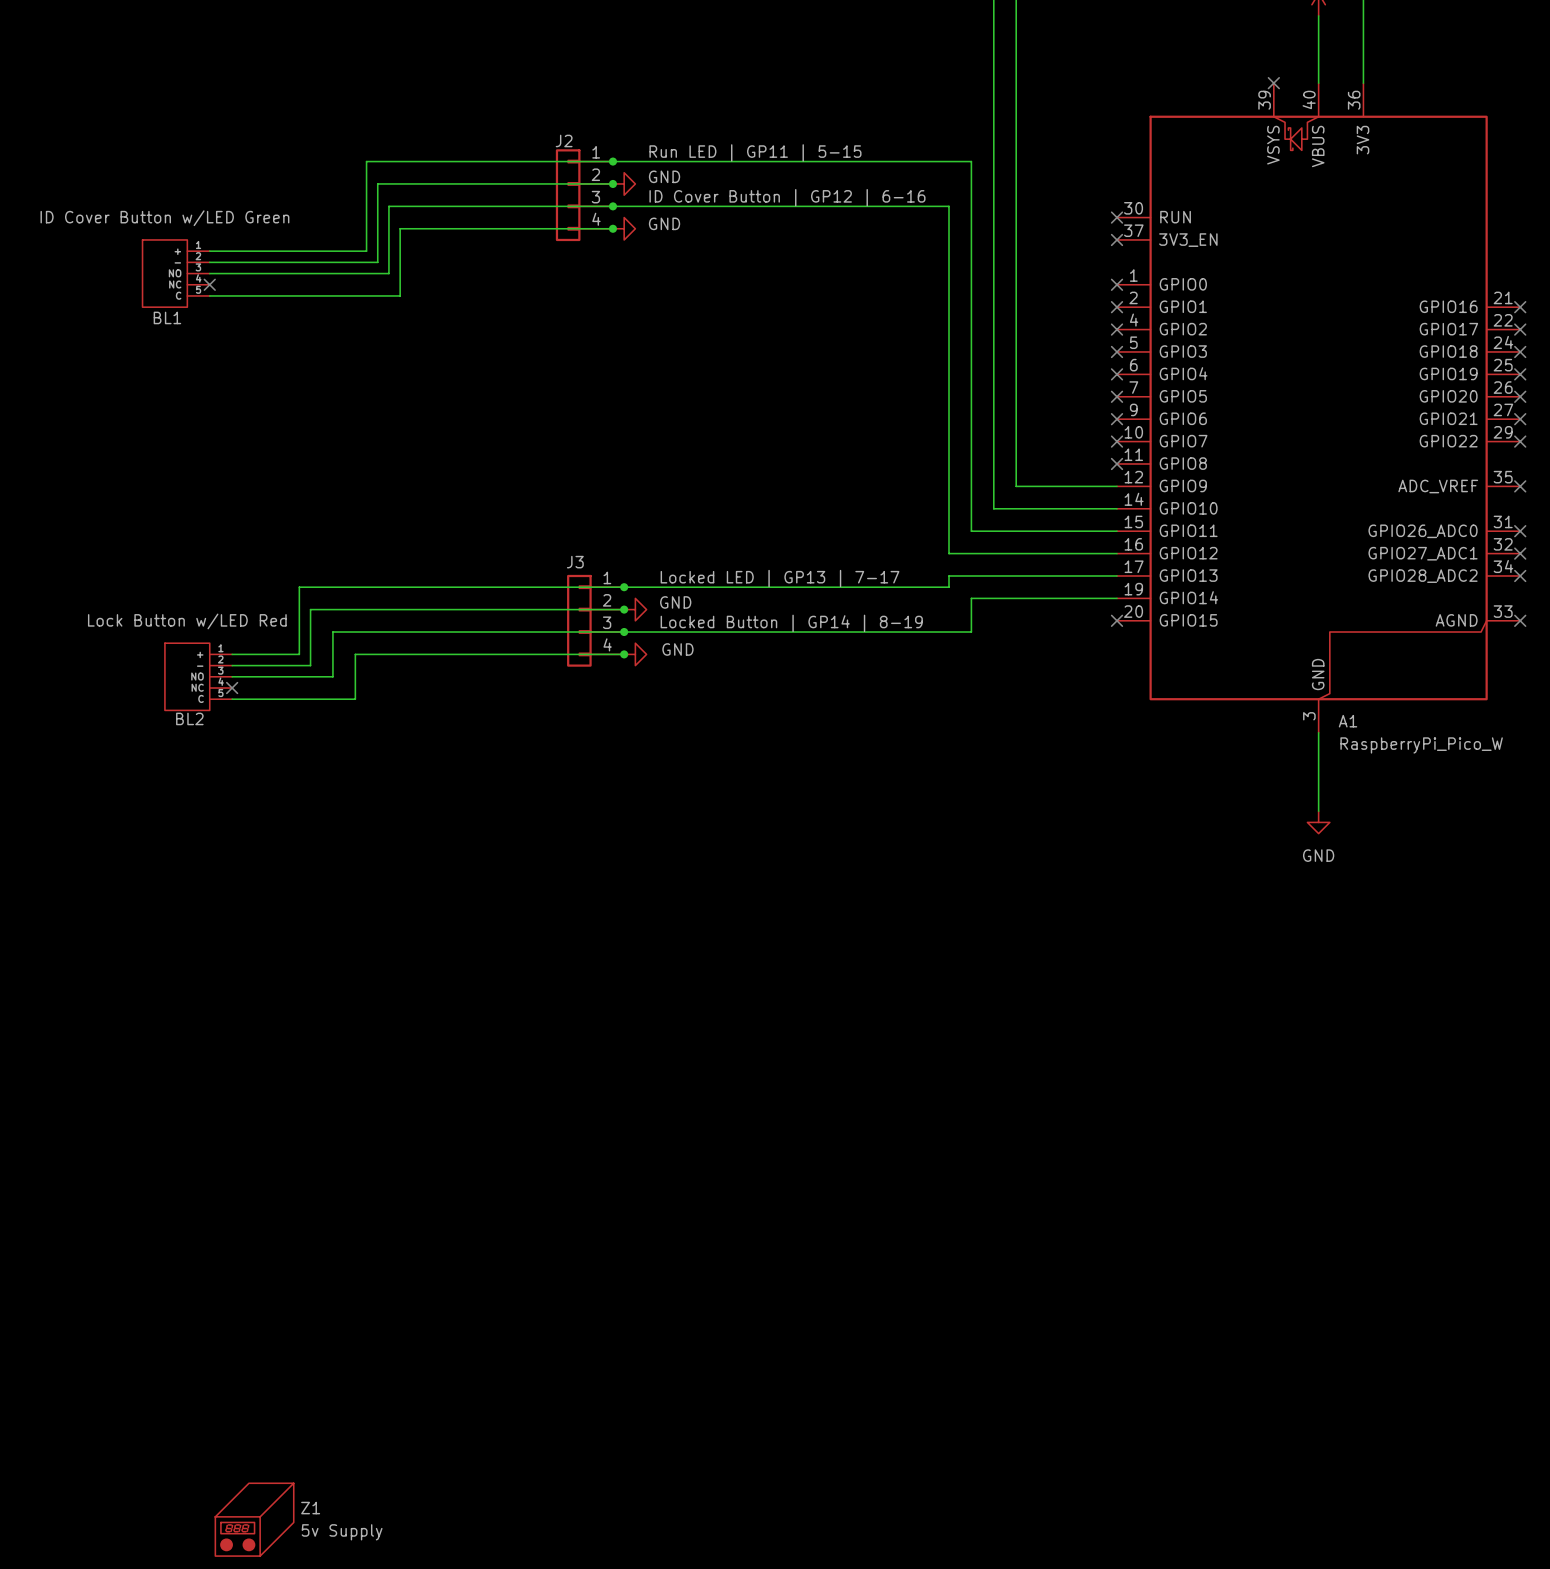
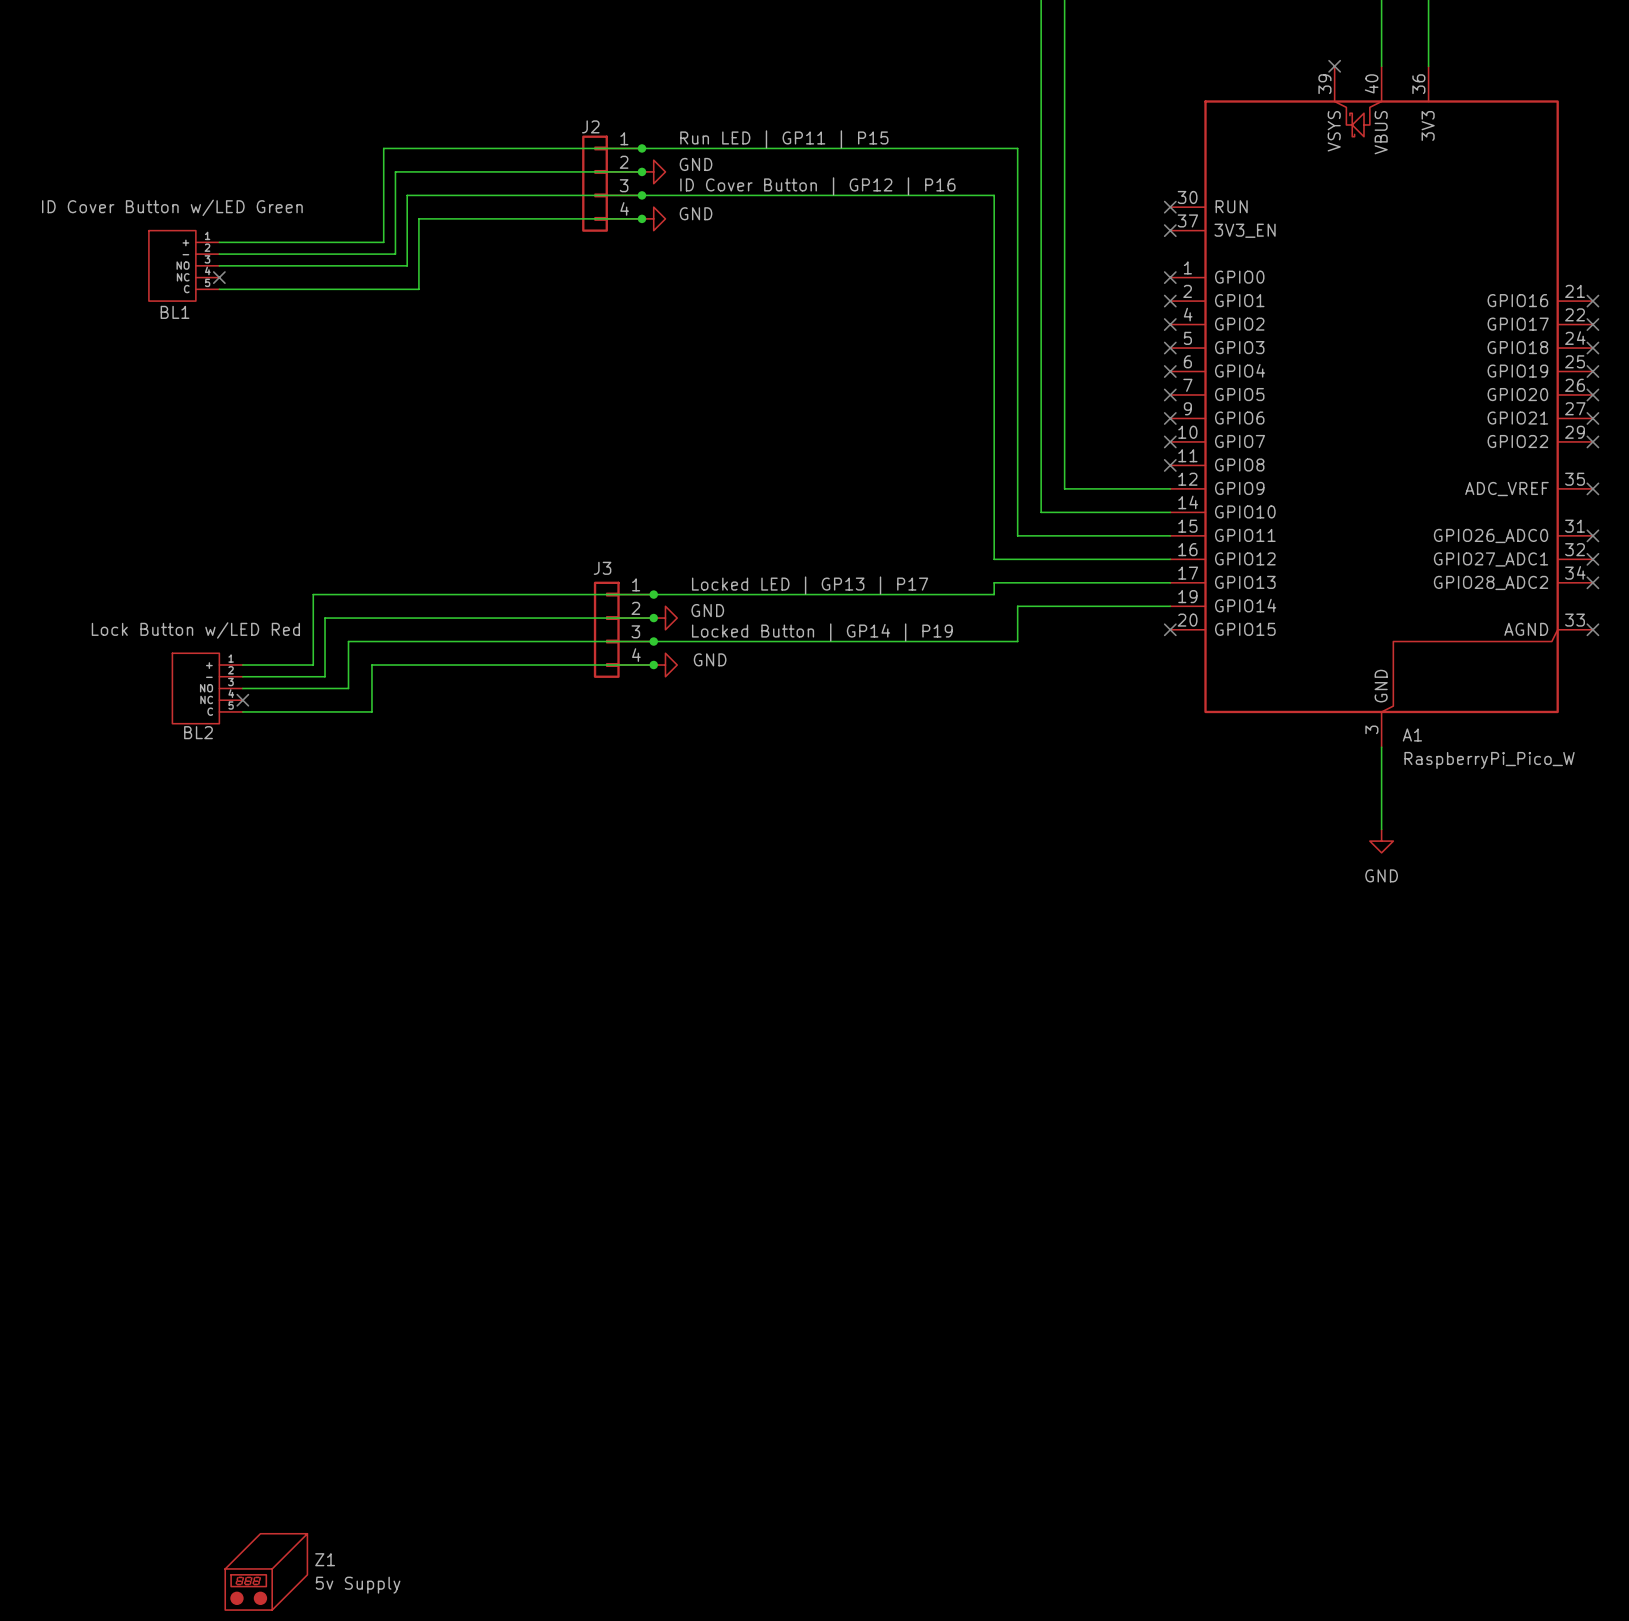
label: Run LED | GP11 | 5-15 (755, 152) -> Run LED | GP11 | P15 (784, 139)
label: ID Cover Button | GP12 | 6-16 (787, 197) -> ID Cover Button | GP12 | P16 (817, 186)
label: Locked LED | GP13 | 7-17 (780, 578) -> Locked LED | GP13 | P17 (810, 585)
label: Locked Button | GP14 | 8-19 (791, 623) -> Locked Button | GP14 | P19 (822, 632)

